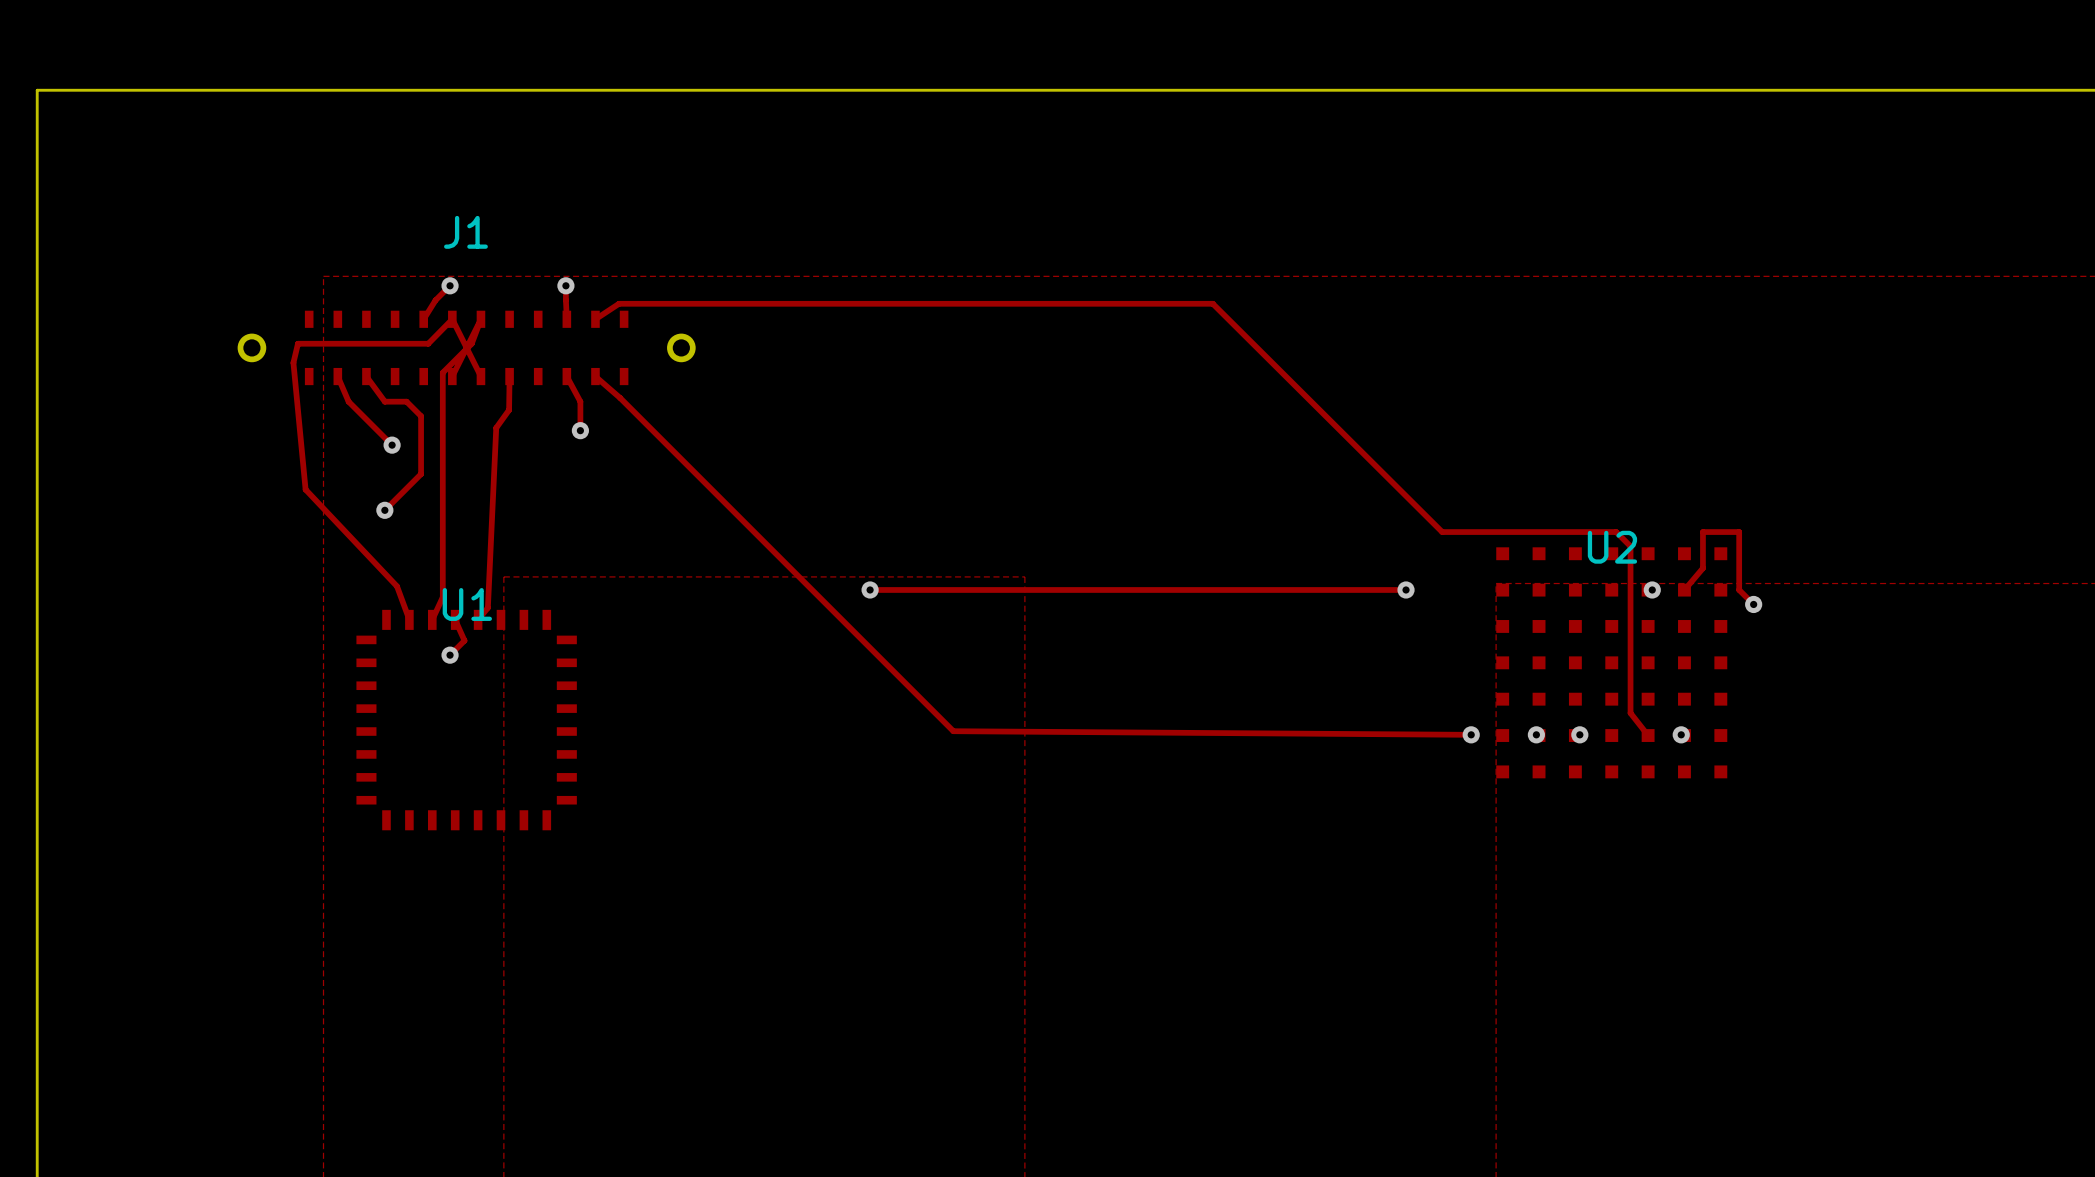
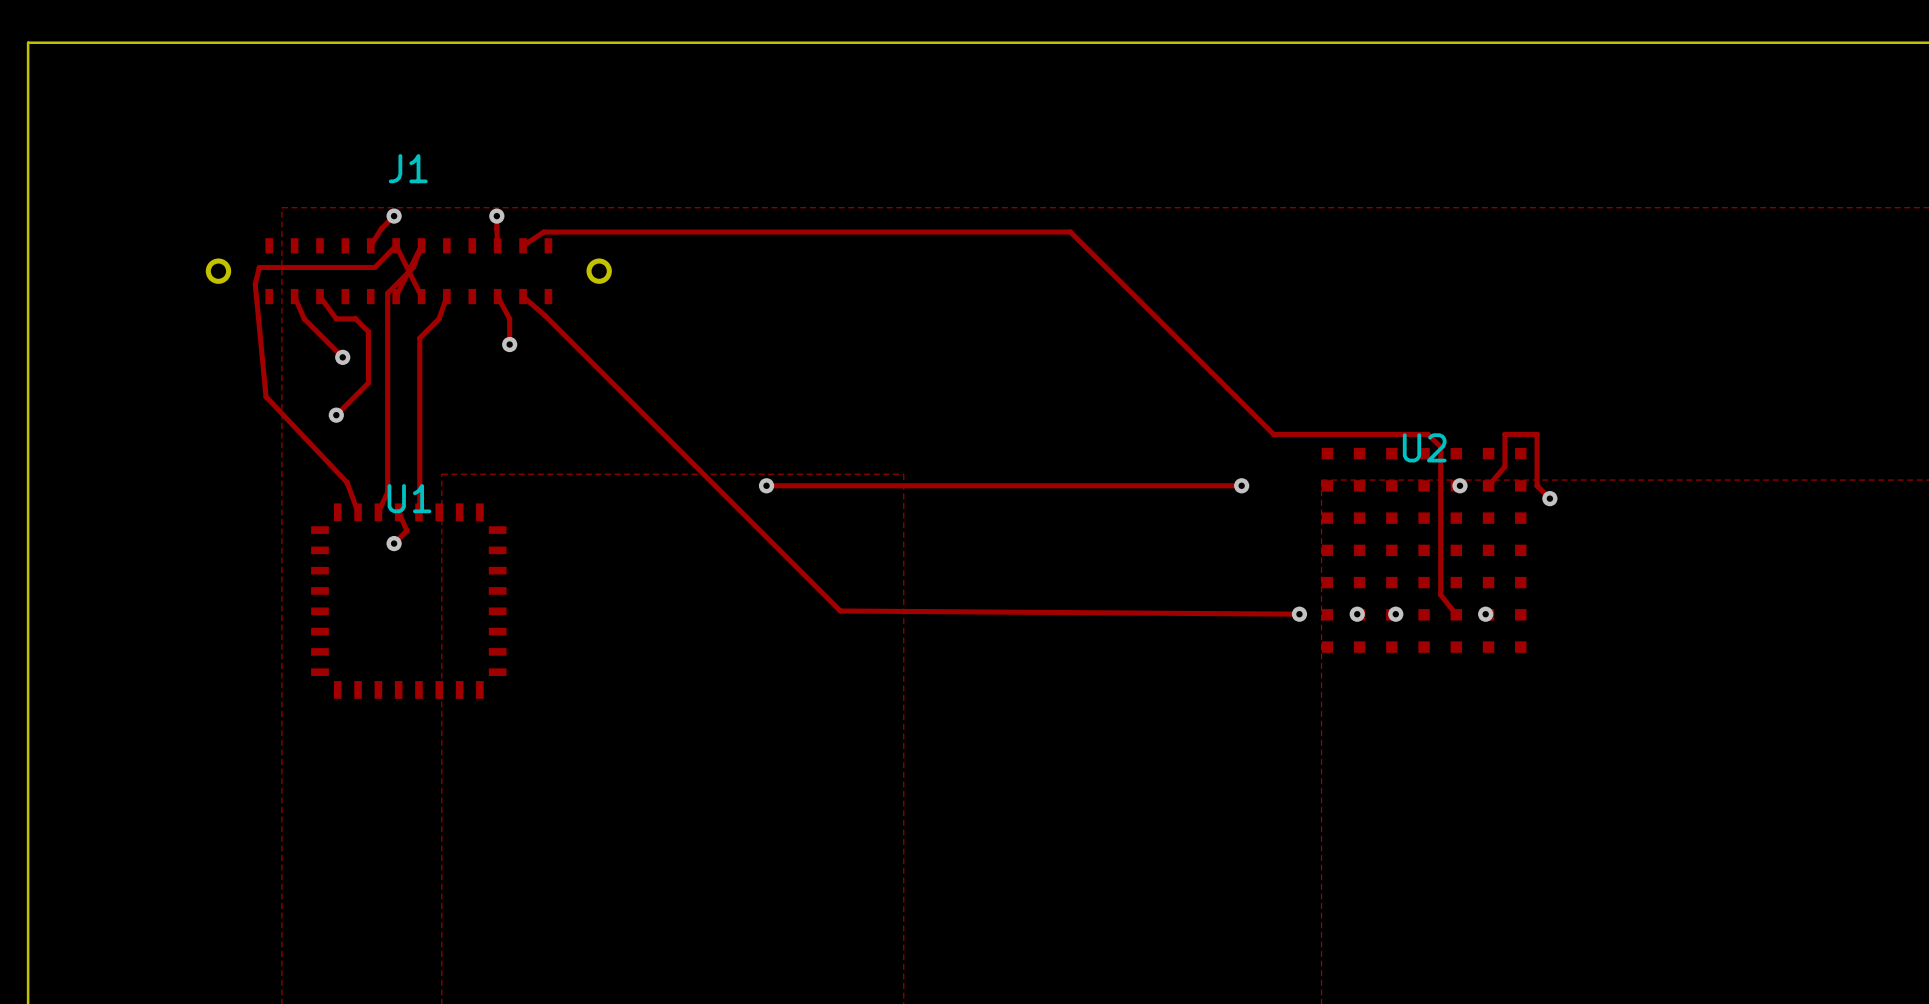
track: (509, 376) (509, 410) (496, 427) (487, 607) (478, 619) -> (446, 296) (439, 318) (419, 338) (418, 512)

